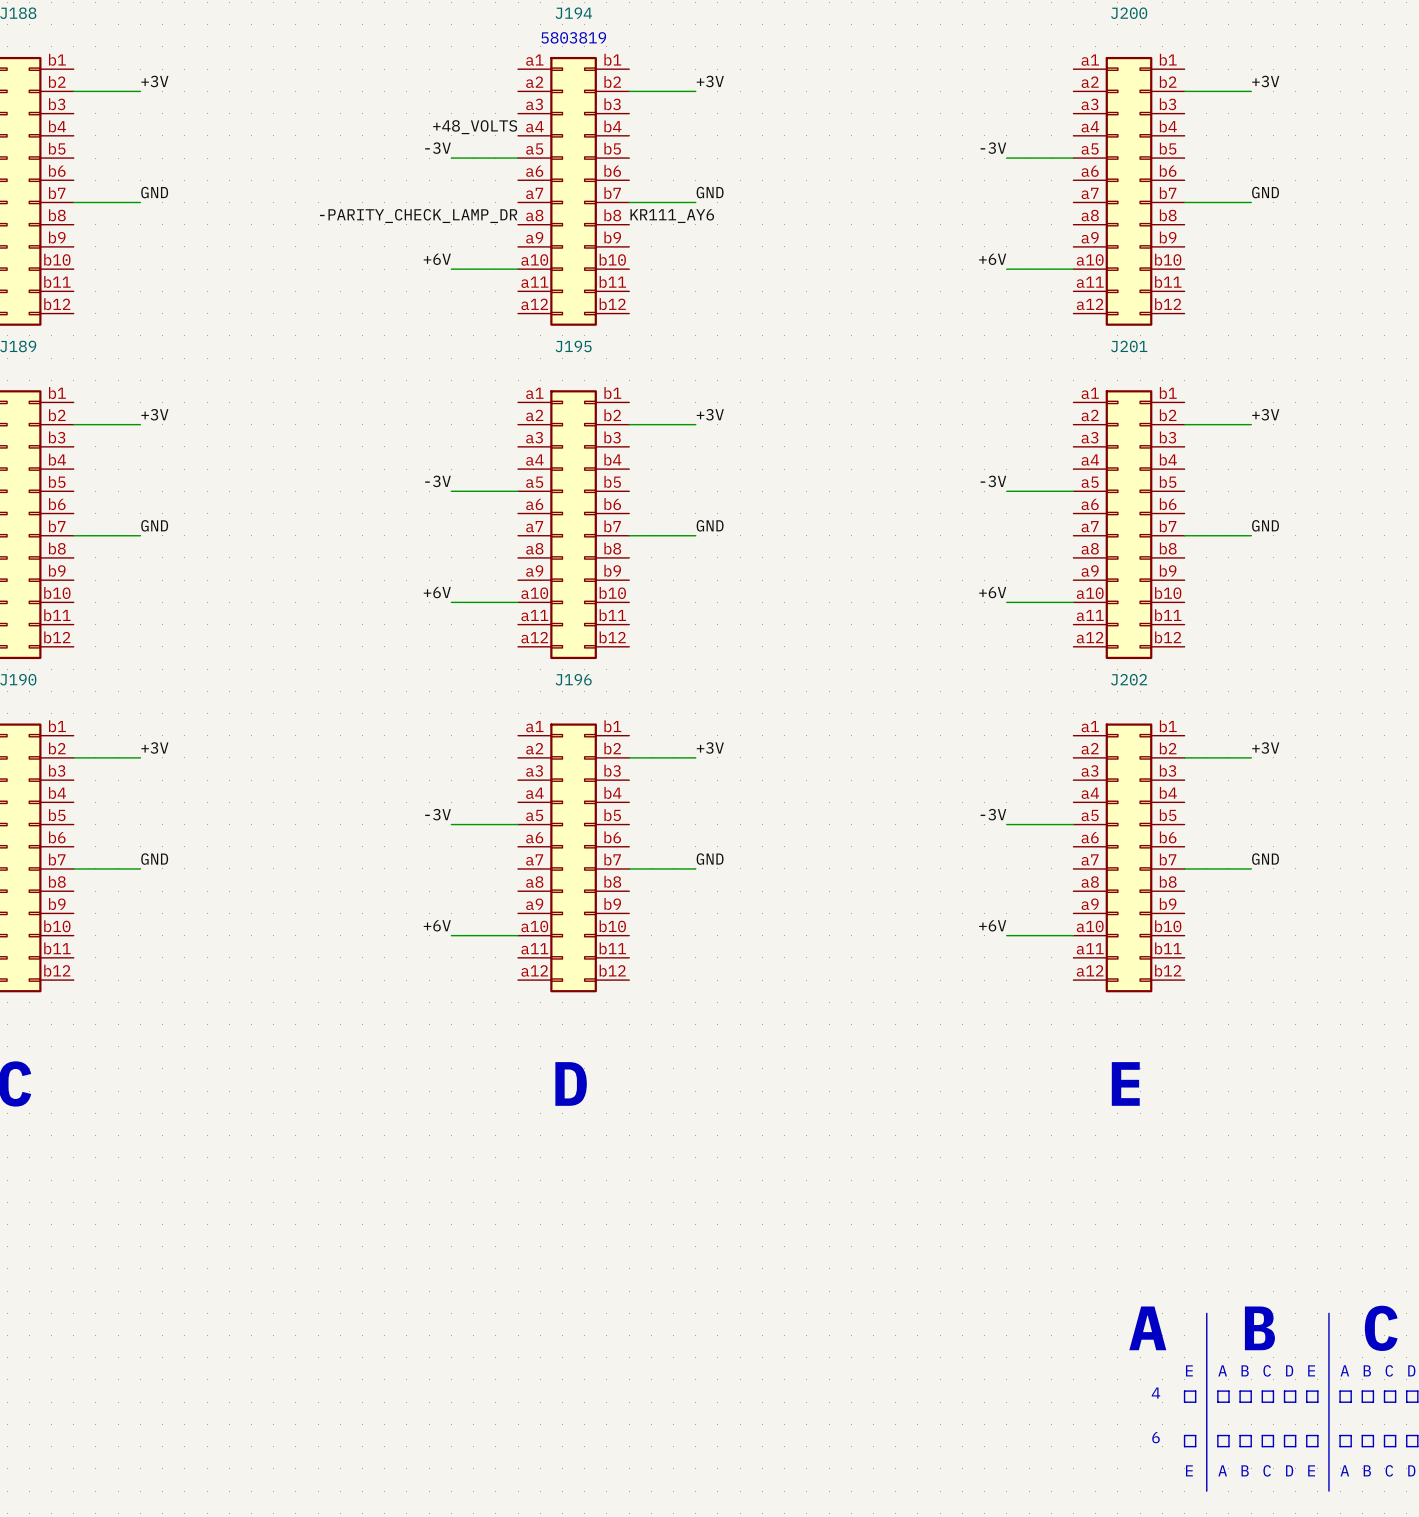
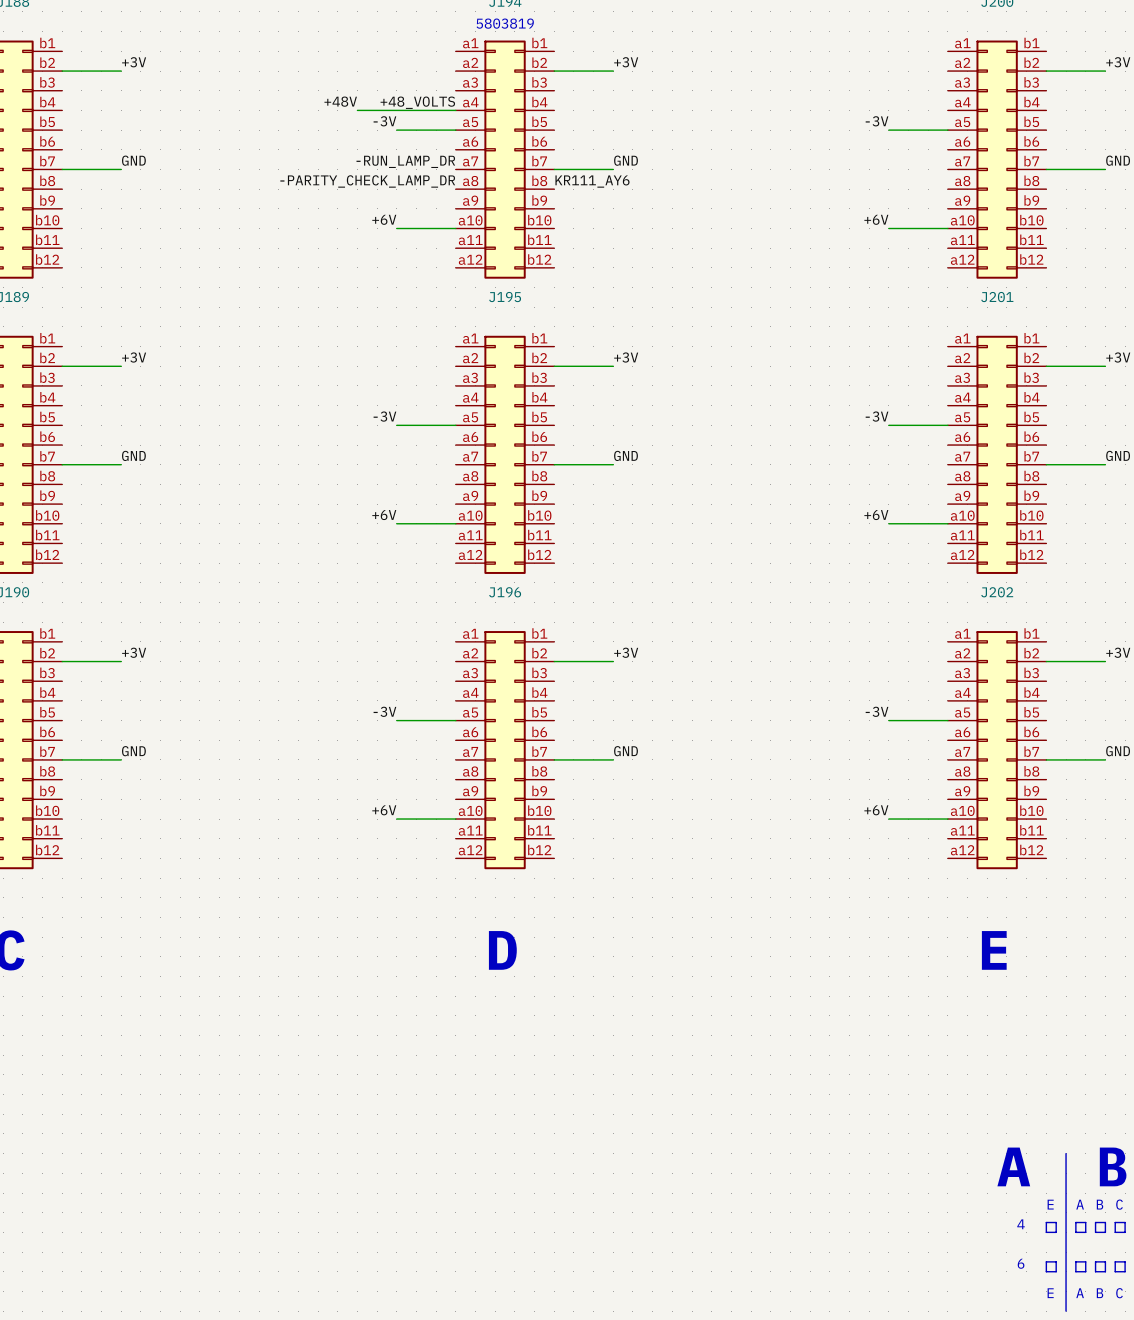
label: none -> +48V (340, 101)
wire: none -> (357, 110) (455, 110)
label: none -> -RUN_LAMP_DR (405, 161)

